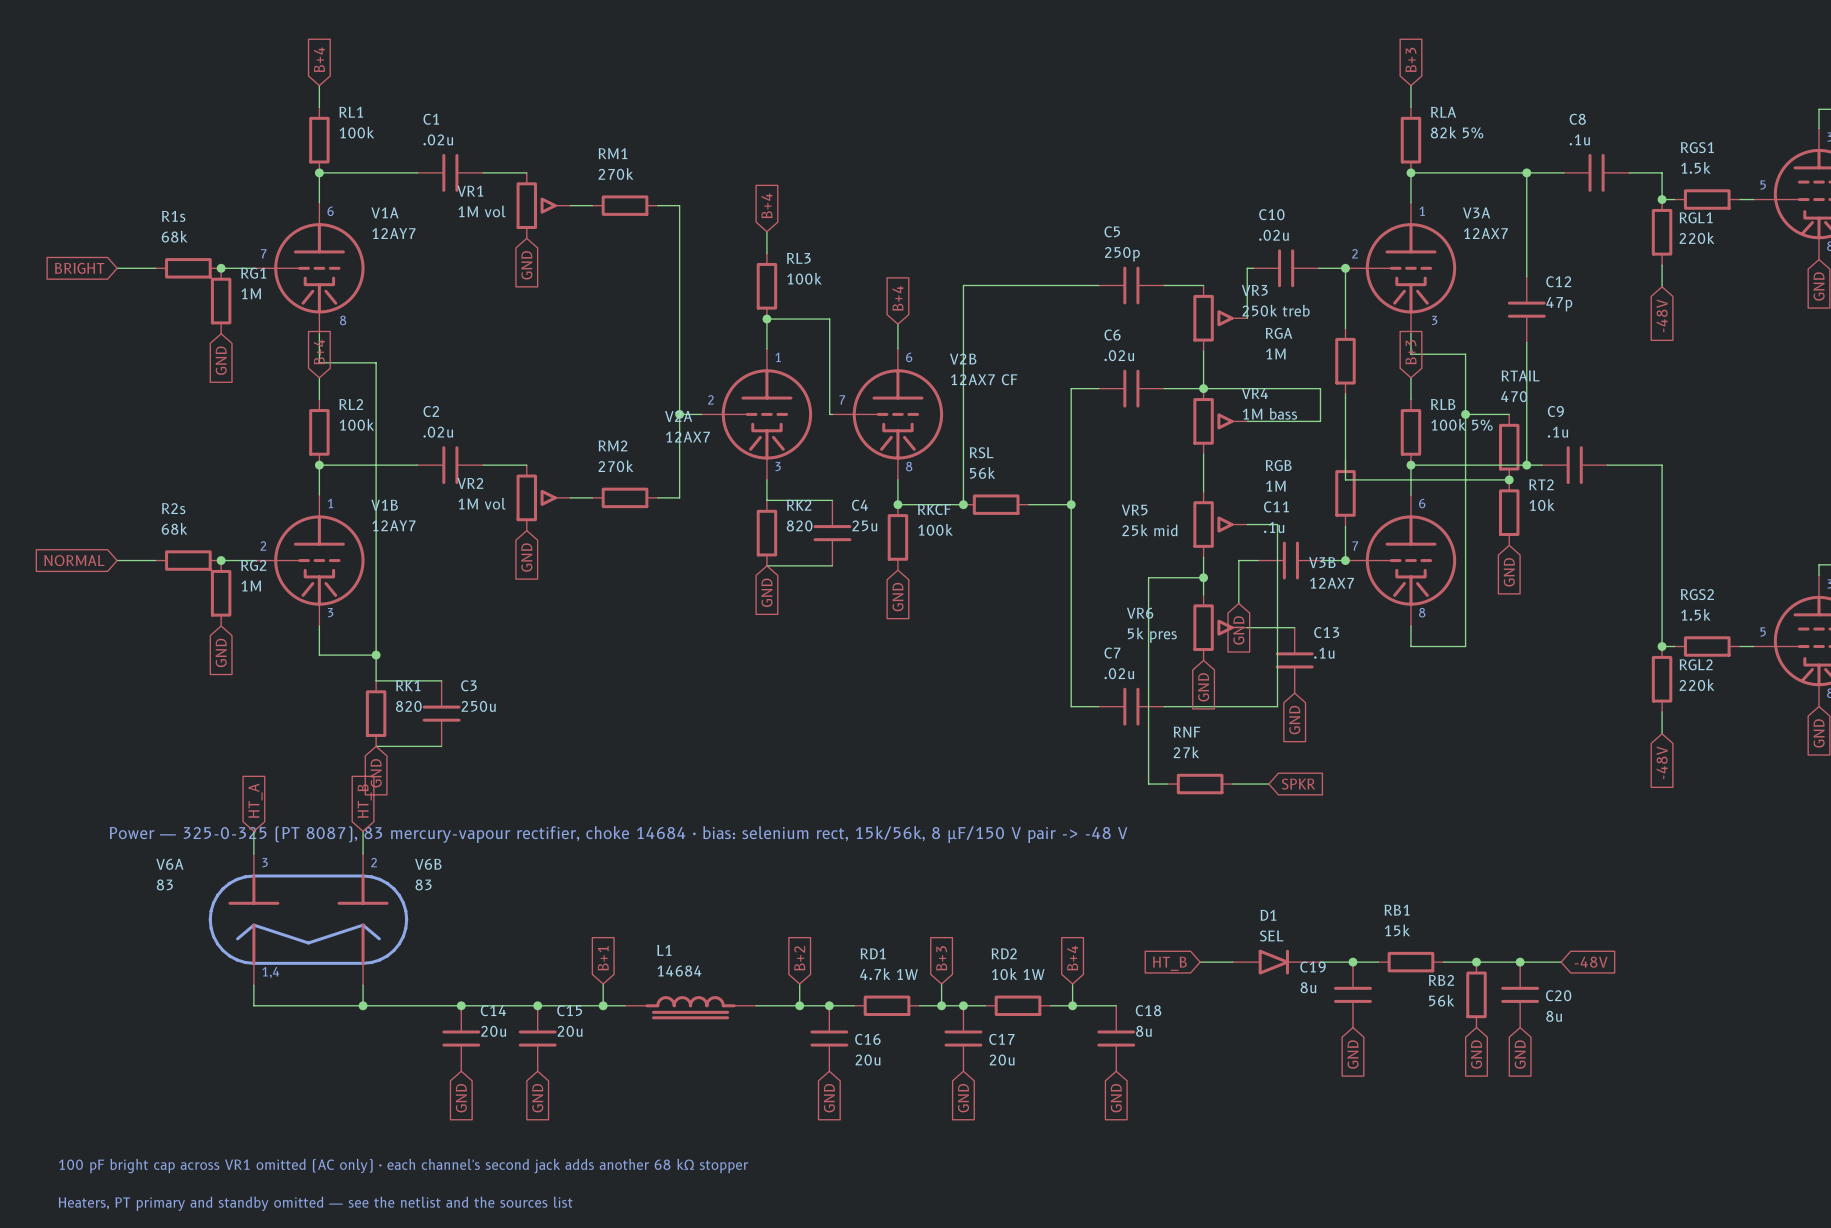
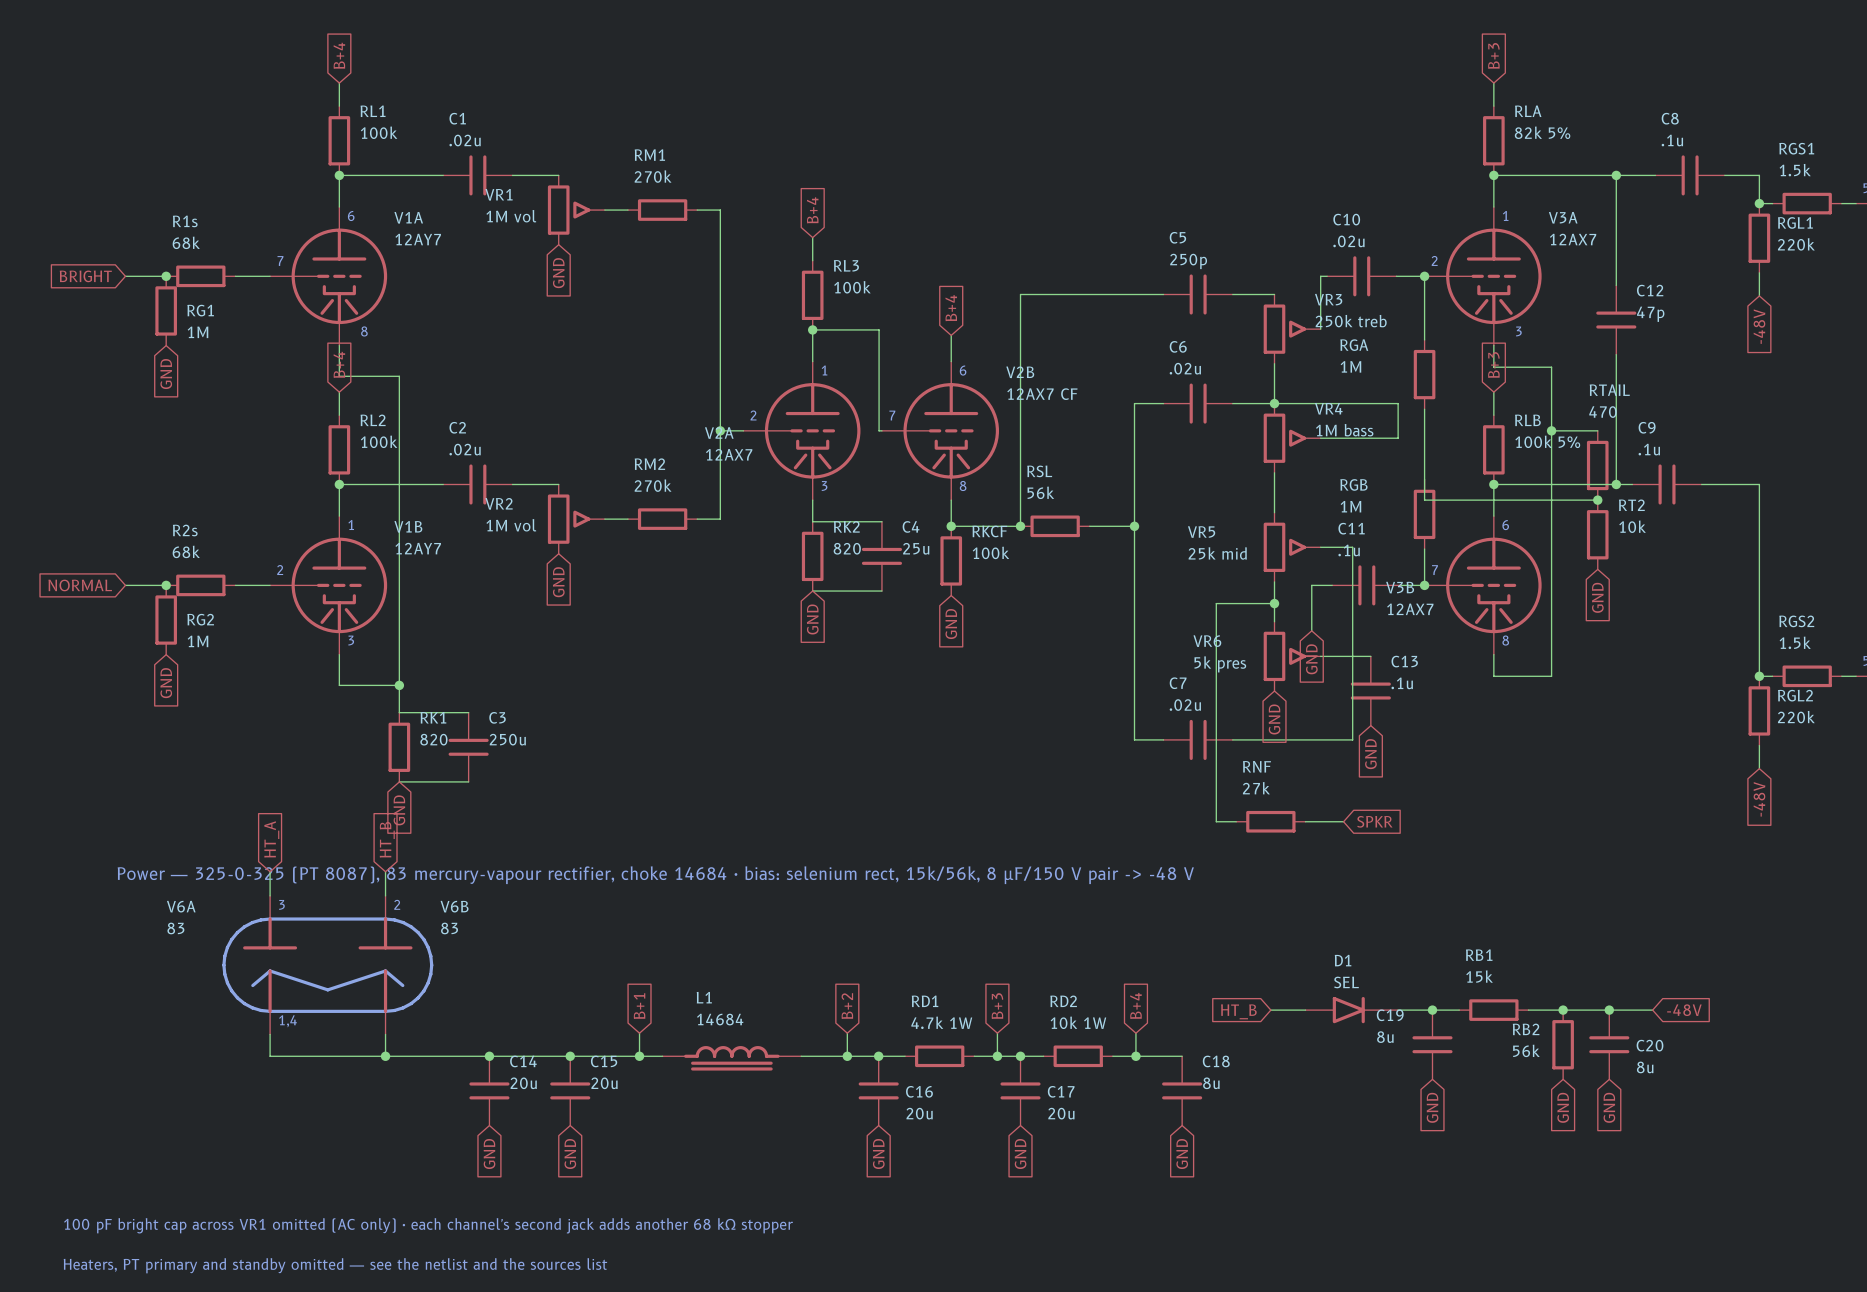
junction: none -> (166, 276)
junction: (221, 268) -> none
RG1 name position: RG1 (253, 273) -> RG1 (200, 310)
RG1 value position: 1M (251, 293) -> 1M (197, 332)
RG1 position: (221, 301) -> (166, 310)
global label position: GND (221, 360) -> GND (166, 374)
junction: none -> (166, 585)
junction: (221, 560) -> none
RG2 name position: RG2 (253, 565) -> RG2 (200, 619)
RG2 value position: 1M (251, 586) -> 1M (197, 641)
RG2 position: (221, 593) -> (166, 620)
global label position: GND (221, 652) -> GND (166, 683)

